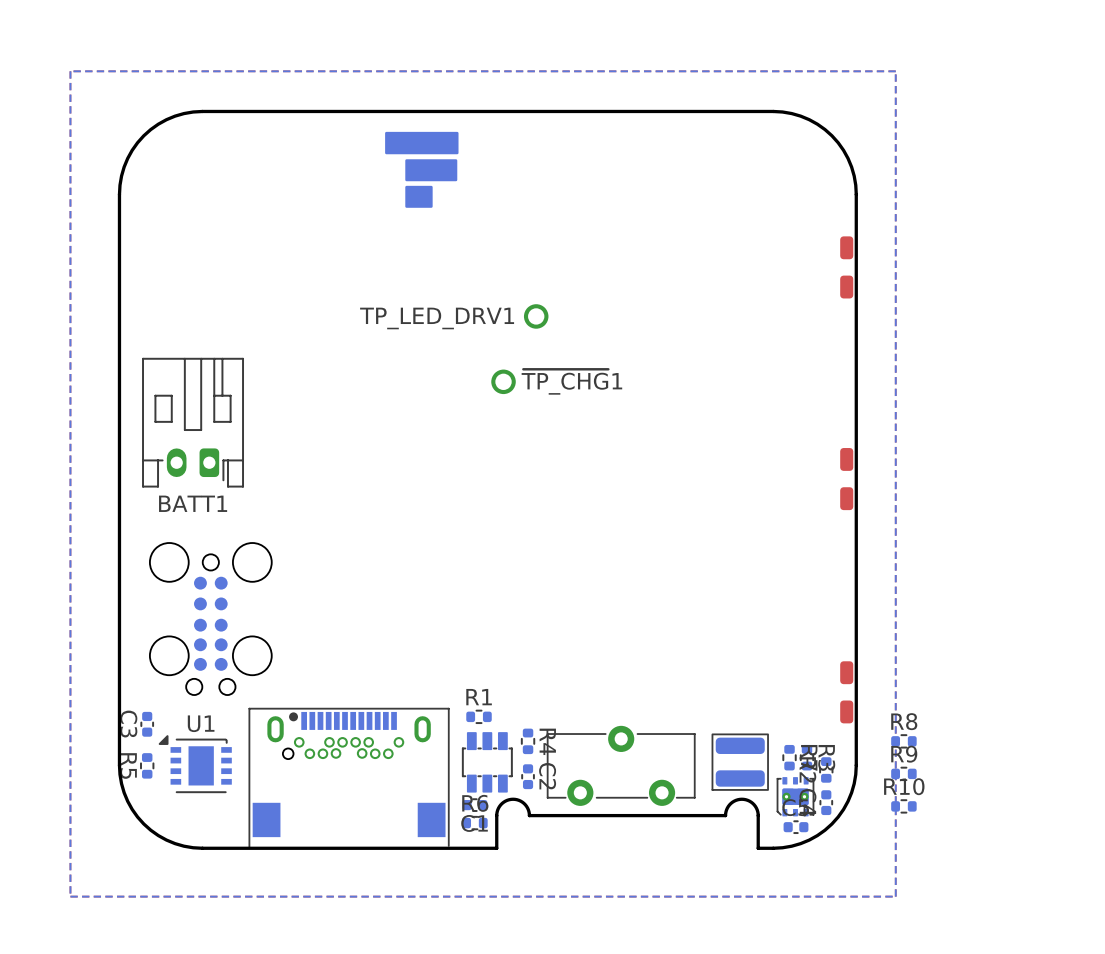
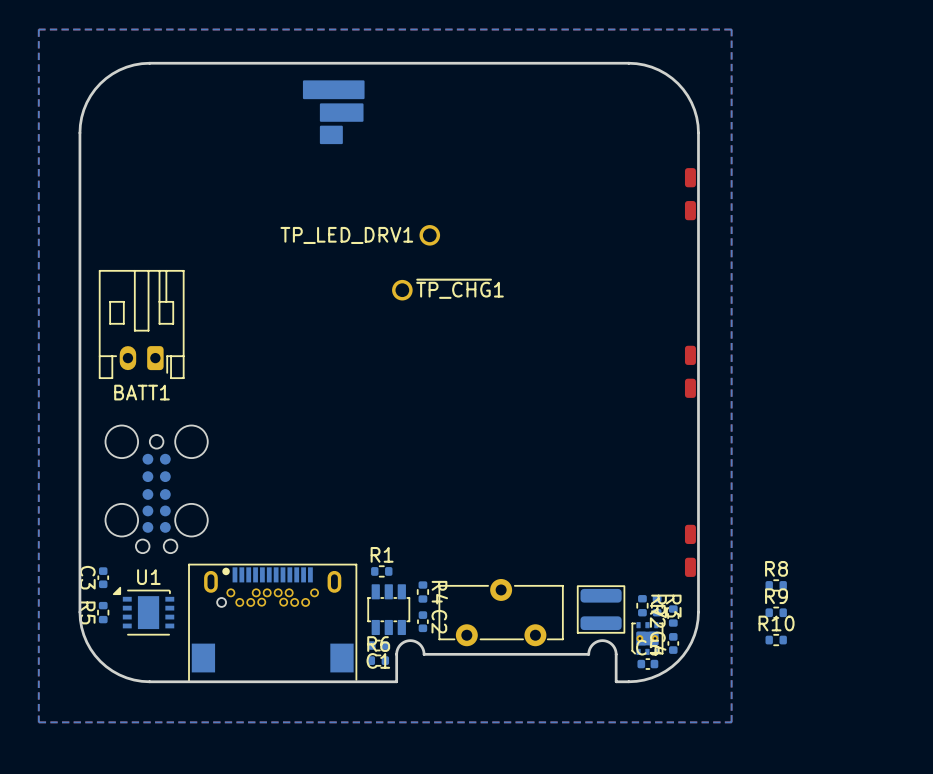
R8 position: (903, 741) -> (776, 585)
R9 position: (903, 773) -> (776, 612)
R10 position: (903, 806) -> (776, 640)

